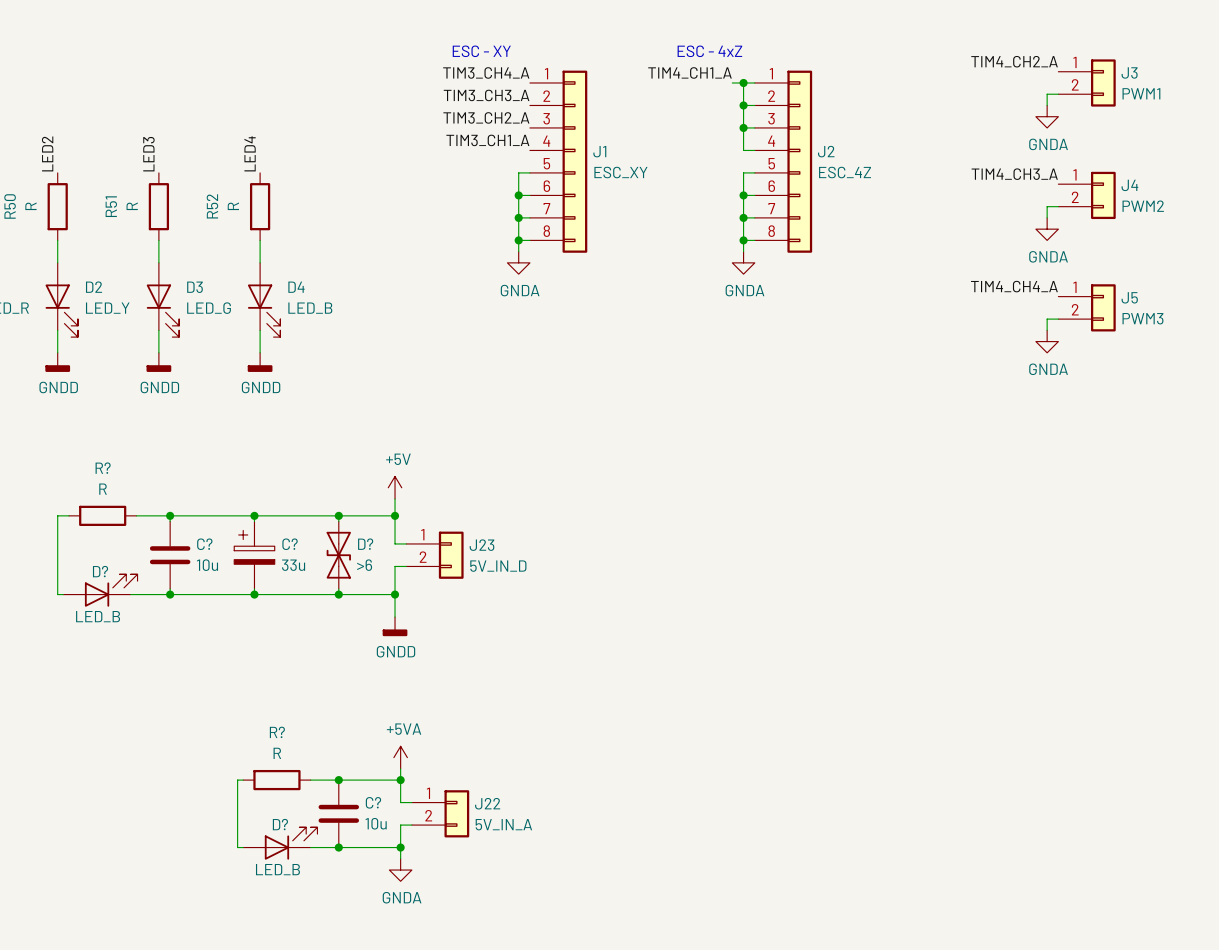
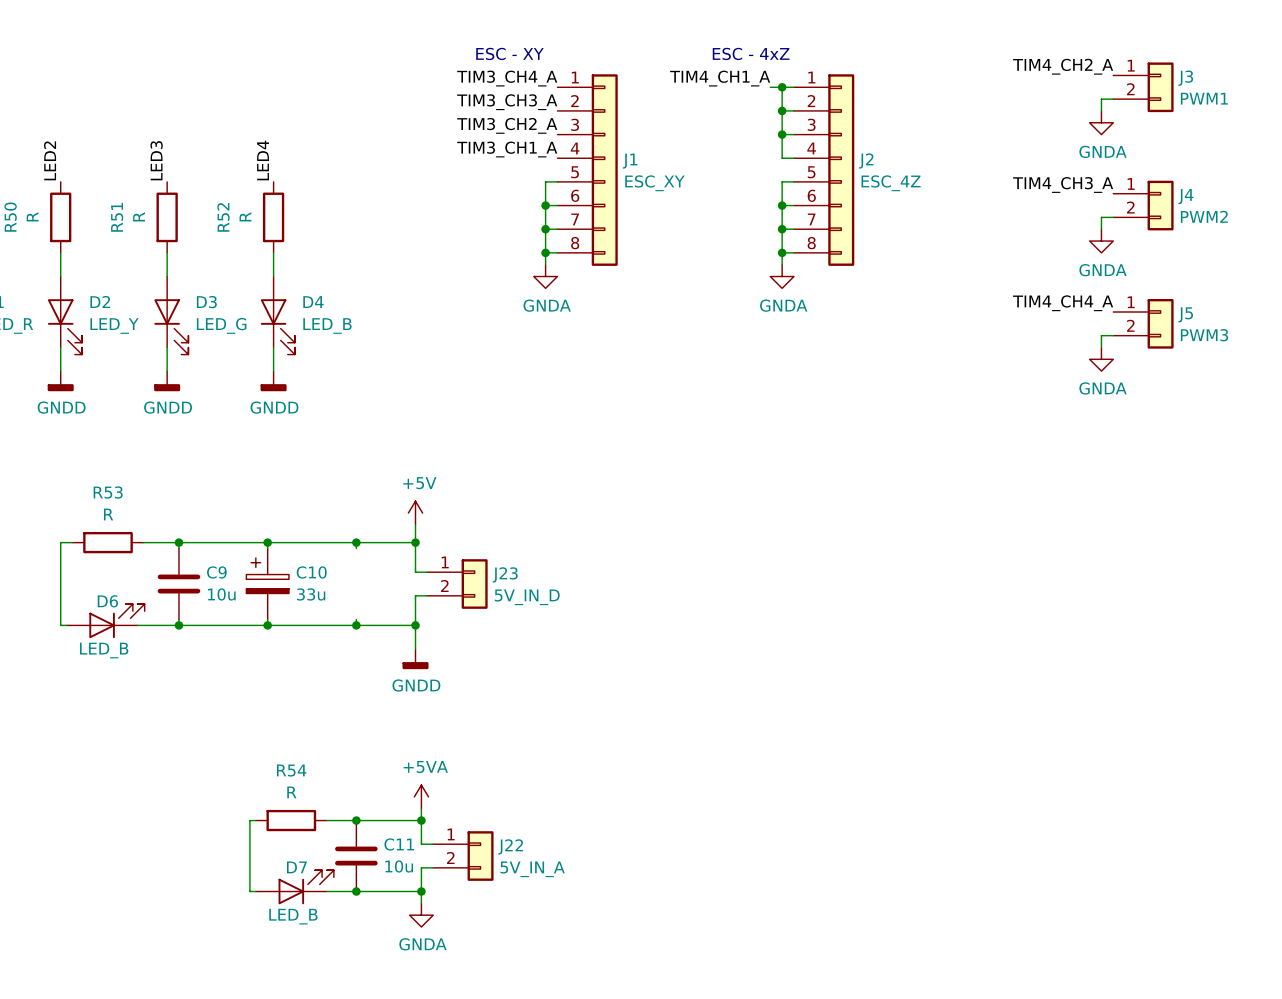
R? name: R? (103, 468) -> R53 (108, 492)
C? name: C? (204, 544) -> C9 (216, 572)
C? name: C? (290, 544) -> C10 (311, 572)
D?: >6 (338, 555) -> none
D? name: D? (100, 571) -> D6 (107, 601)
R? name: R? (277, 732) -> R54 (291, 770)
C? name: C? (373, 802) -> C11 (399, 844)
D? name: D? (280, 824) -> D7 (296, 867)

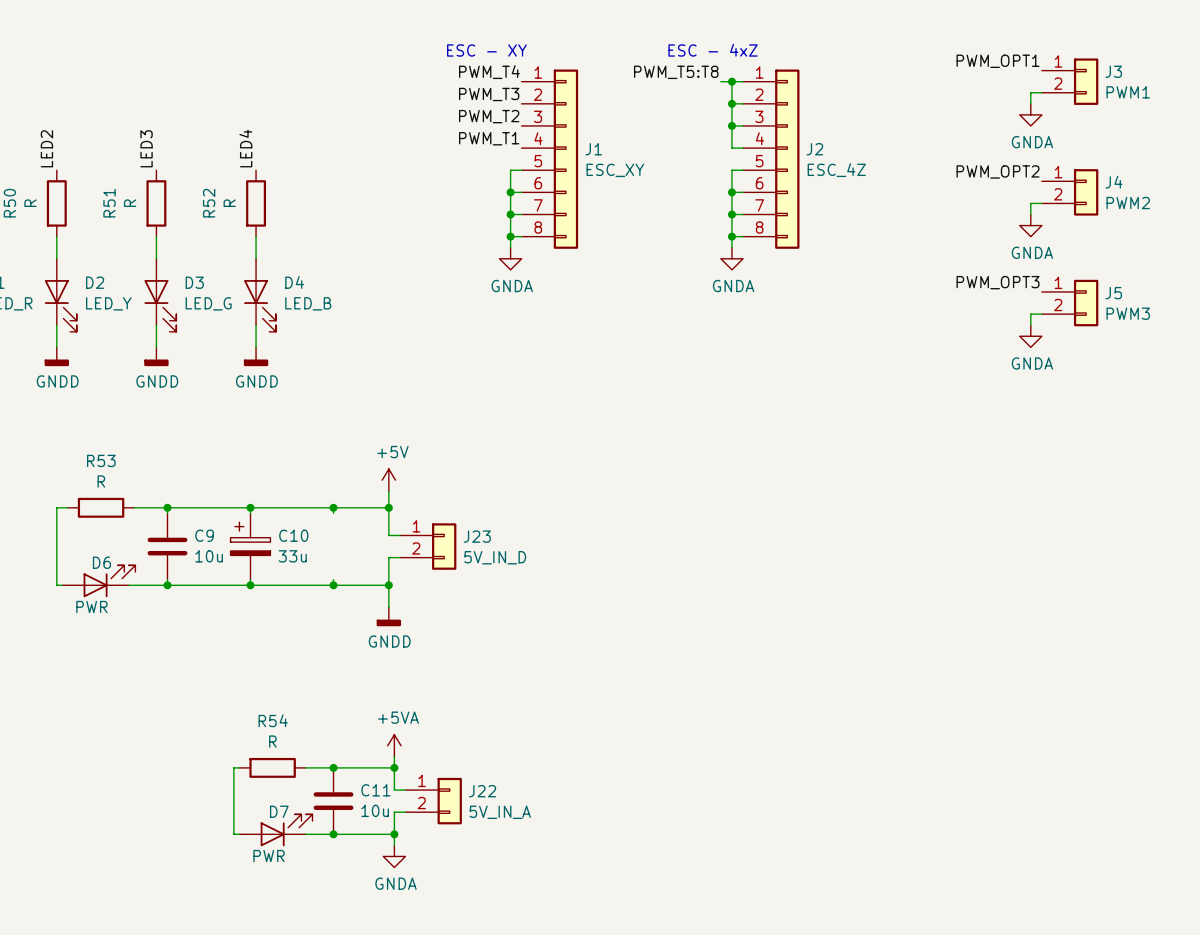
label: TIM4_CH2_A (1063, 66) -> PWM_OPT1 (998, 61)
label: TIM3_CH4_A (507, 78) -> PWM_T4 (489, 72)
label: TIM4_CH1_A (720, 78) -> PWM_T5:T8 (676, 72)
label: TIM3_CH3_A (507, 102) -> PWM_T3 (489, 94)
label: TIM3_CH2_A (507, 125) -> PWM_T2 (489, 116)
label: TIM3_CH1_A (507, 149) -> PWM_T1 (489, 138)
label: TIM4_CH3_A (1063, 184) -> PWM_OPT2 (998, 171)
label: TIM4_CH4_A (1063, 303) -> PWM_OPT3 (998, 282)
D6 value: LED_B (104, 650) -> PWR (91, 607)
D7 value: LED_B (293, 916) -> PWR (269, 856)

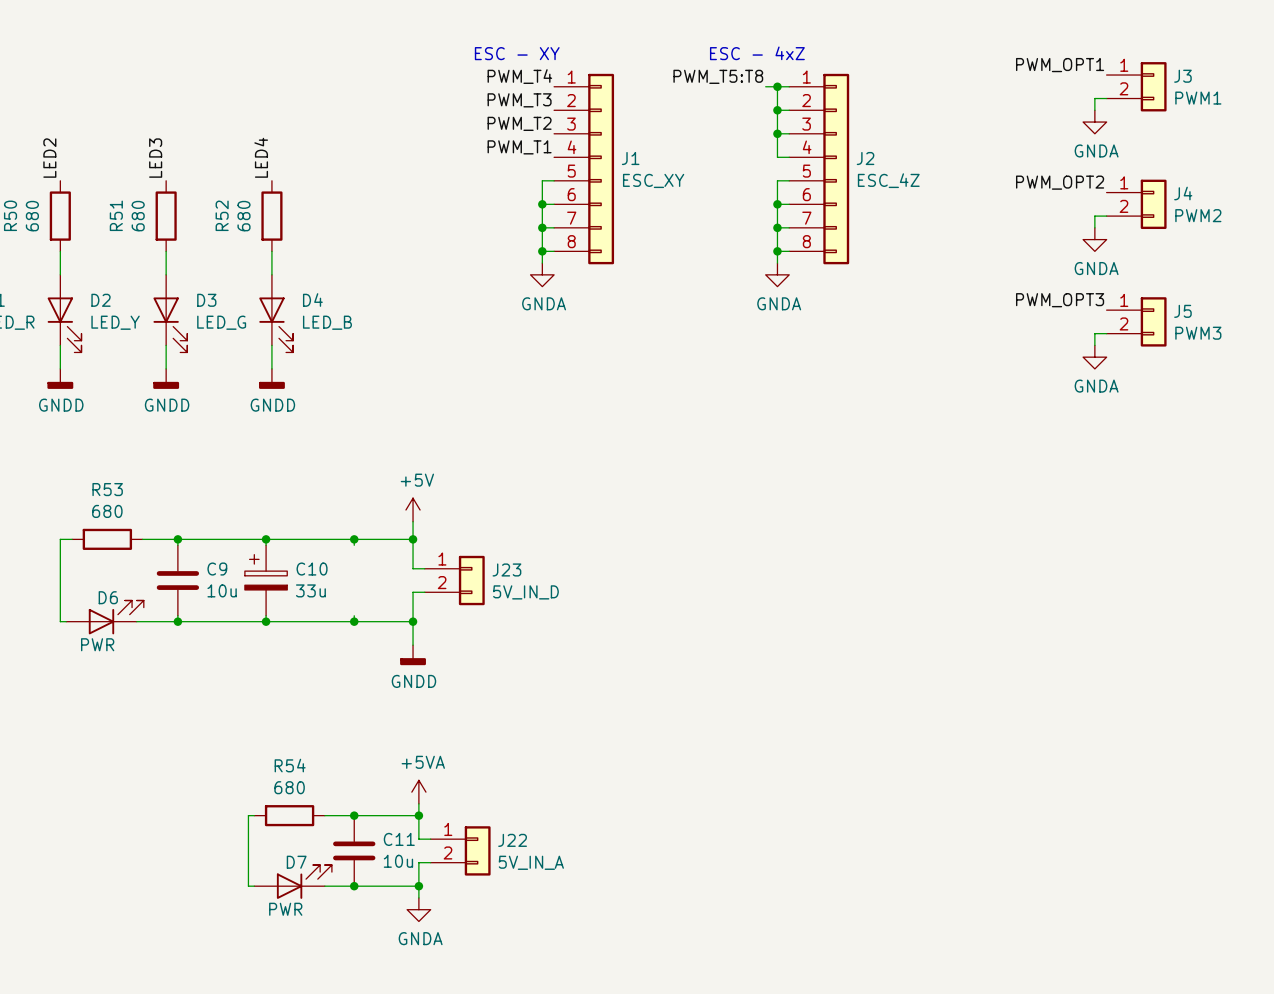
R50 value: R (30, 203) -> 680 (32, 216)
R51 value: R (130, 203) -> 680 (138, 216)
R52 value: R (229, 203) -> 680 (244, 216)
R53 value: R (101, 481) -> 680 (107, 511)
R54 value: R (272, 741) -> 680 (289, 787)

